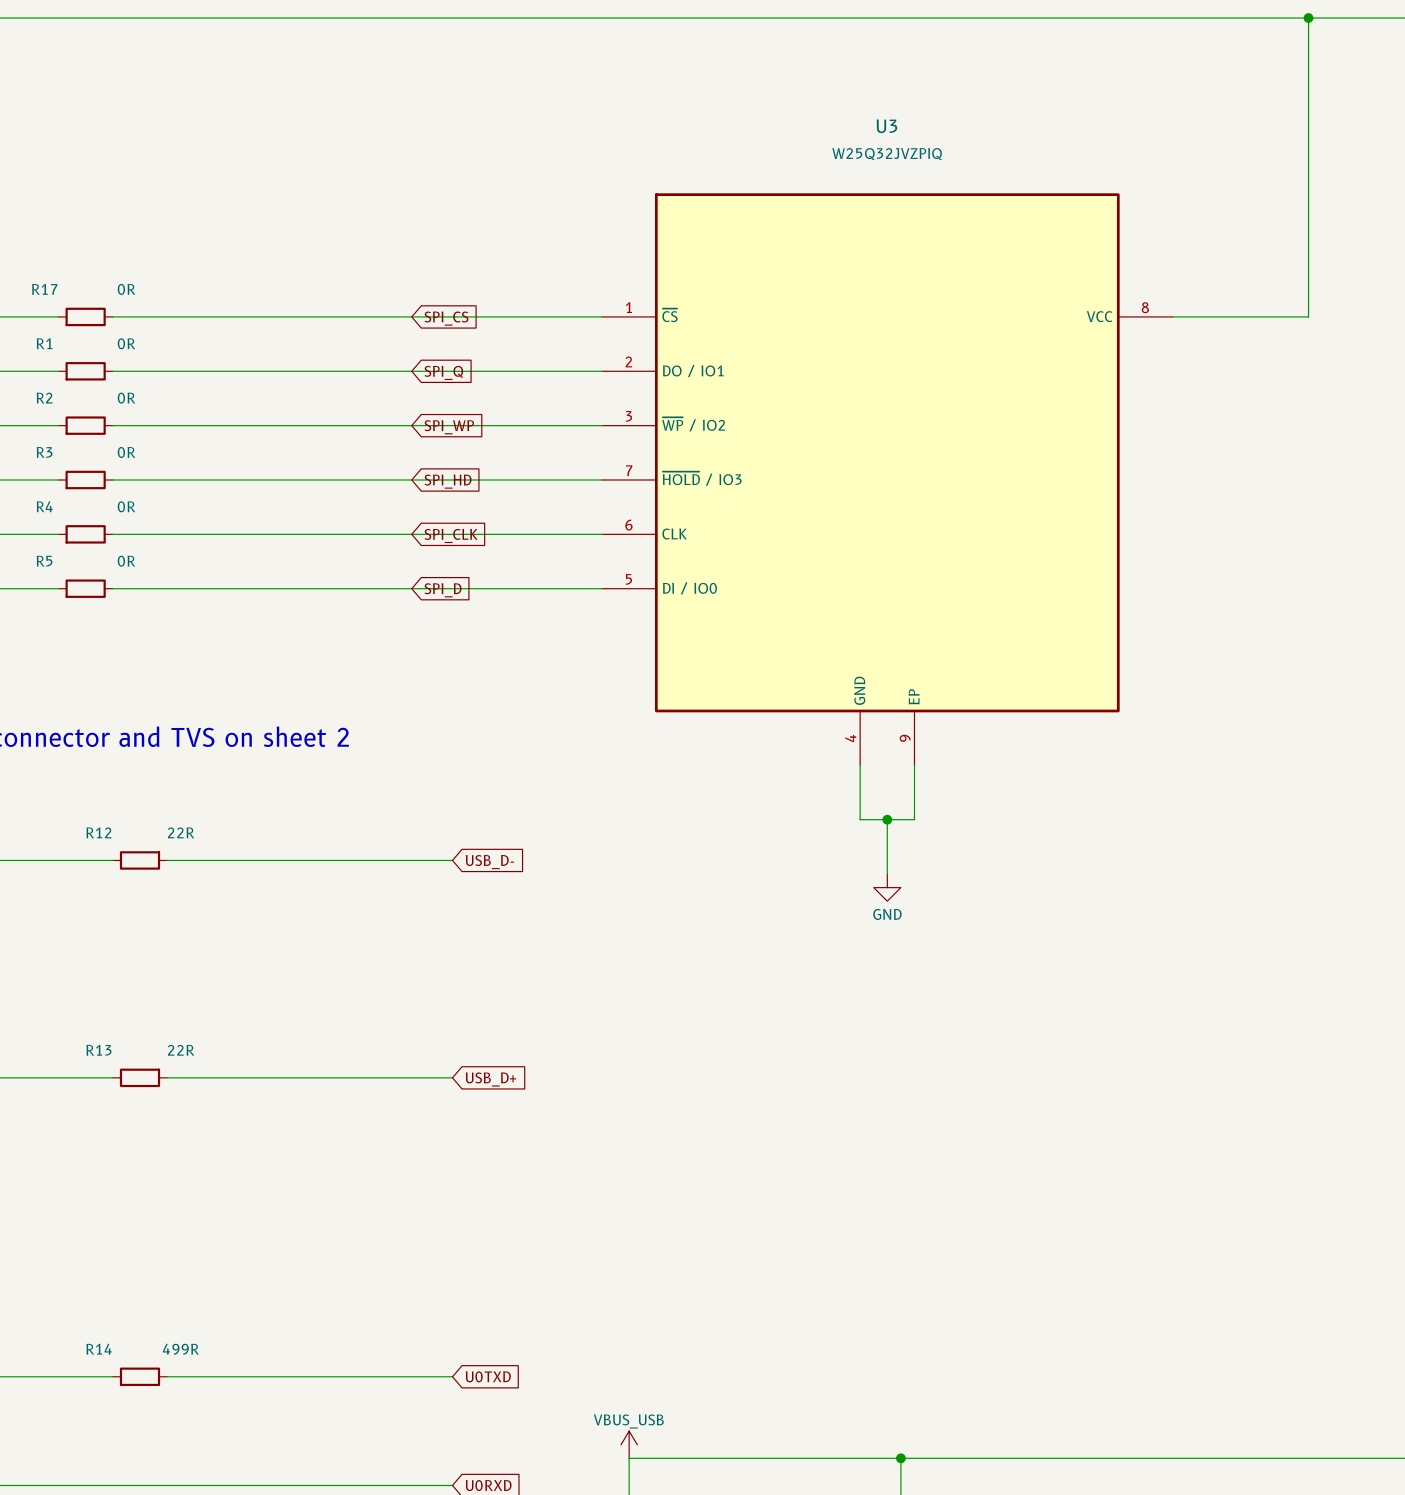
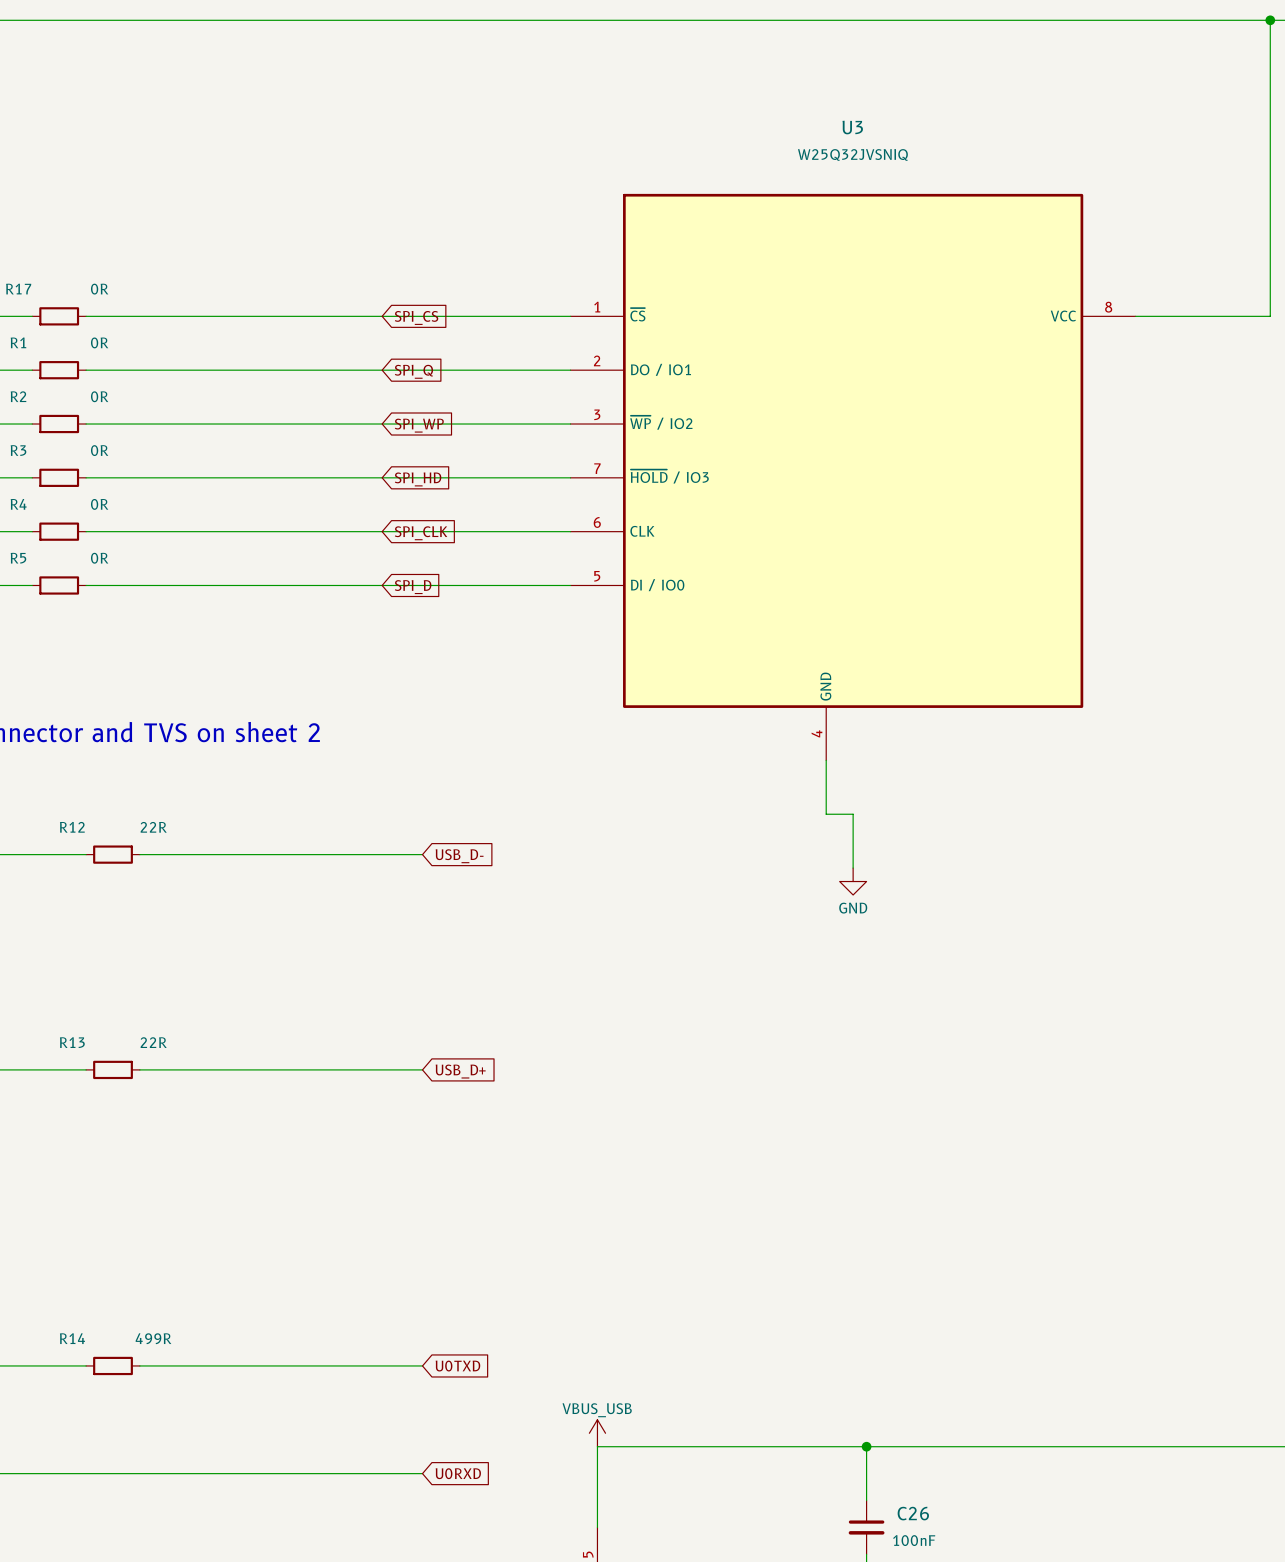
U3 value: W25Q32JVZPIQ (887, 154) -> W25Q32JVSNIQ (852, 154)
U3 symbol: [601, 193, 1173, 766] -> [570, 193, 1136, 761]
wire: (914, 765) (914, 819) (887, 819) -> none
junction: (887, 819) -> none

